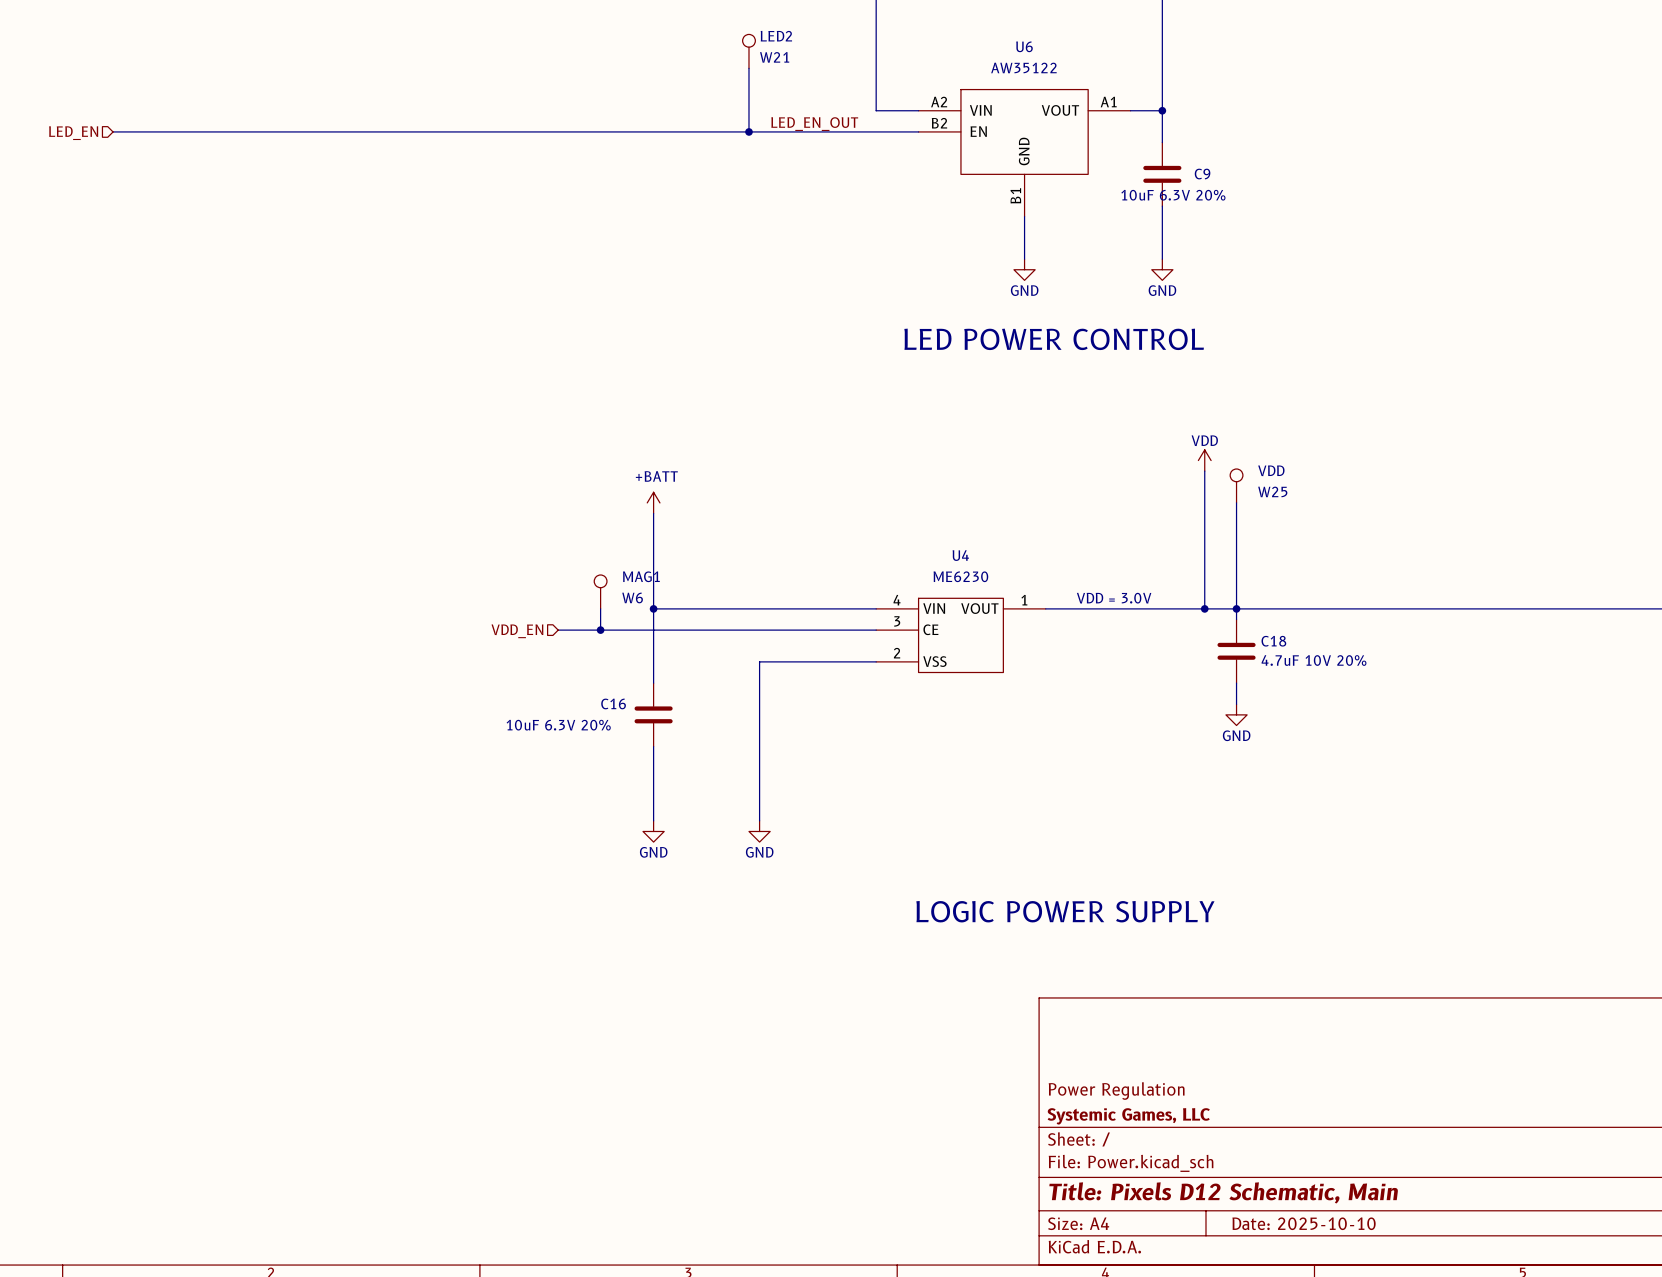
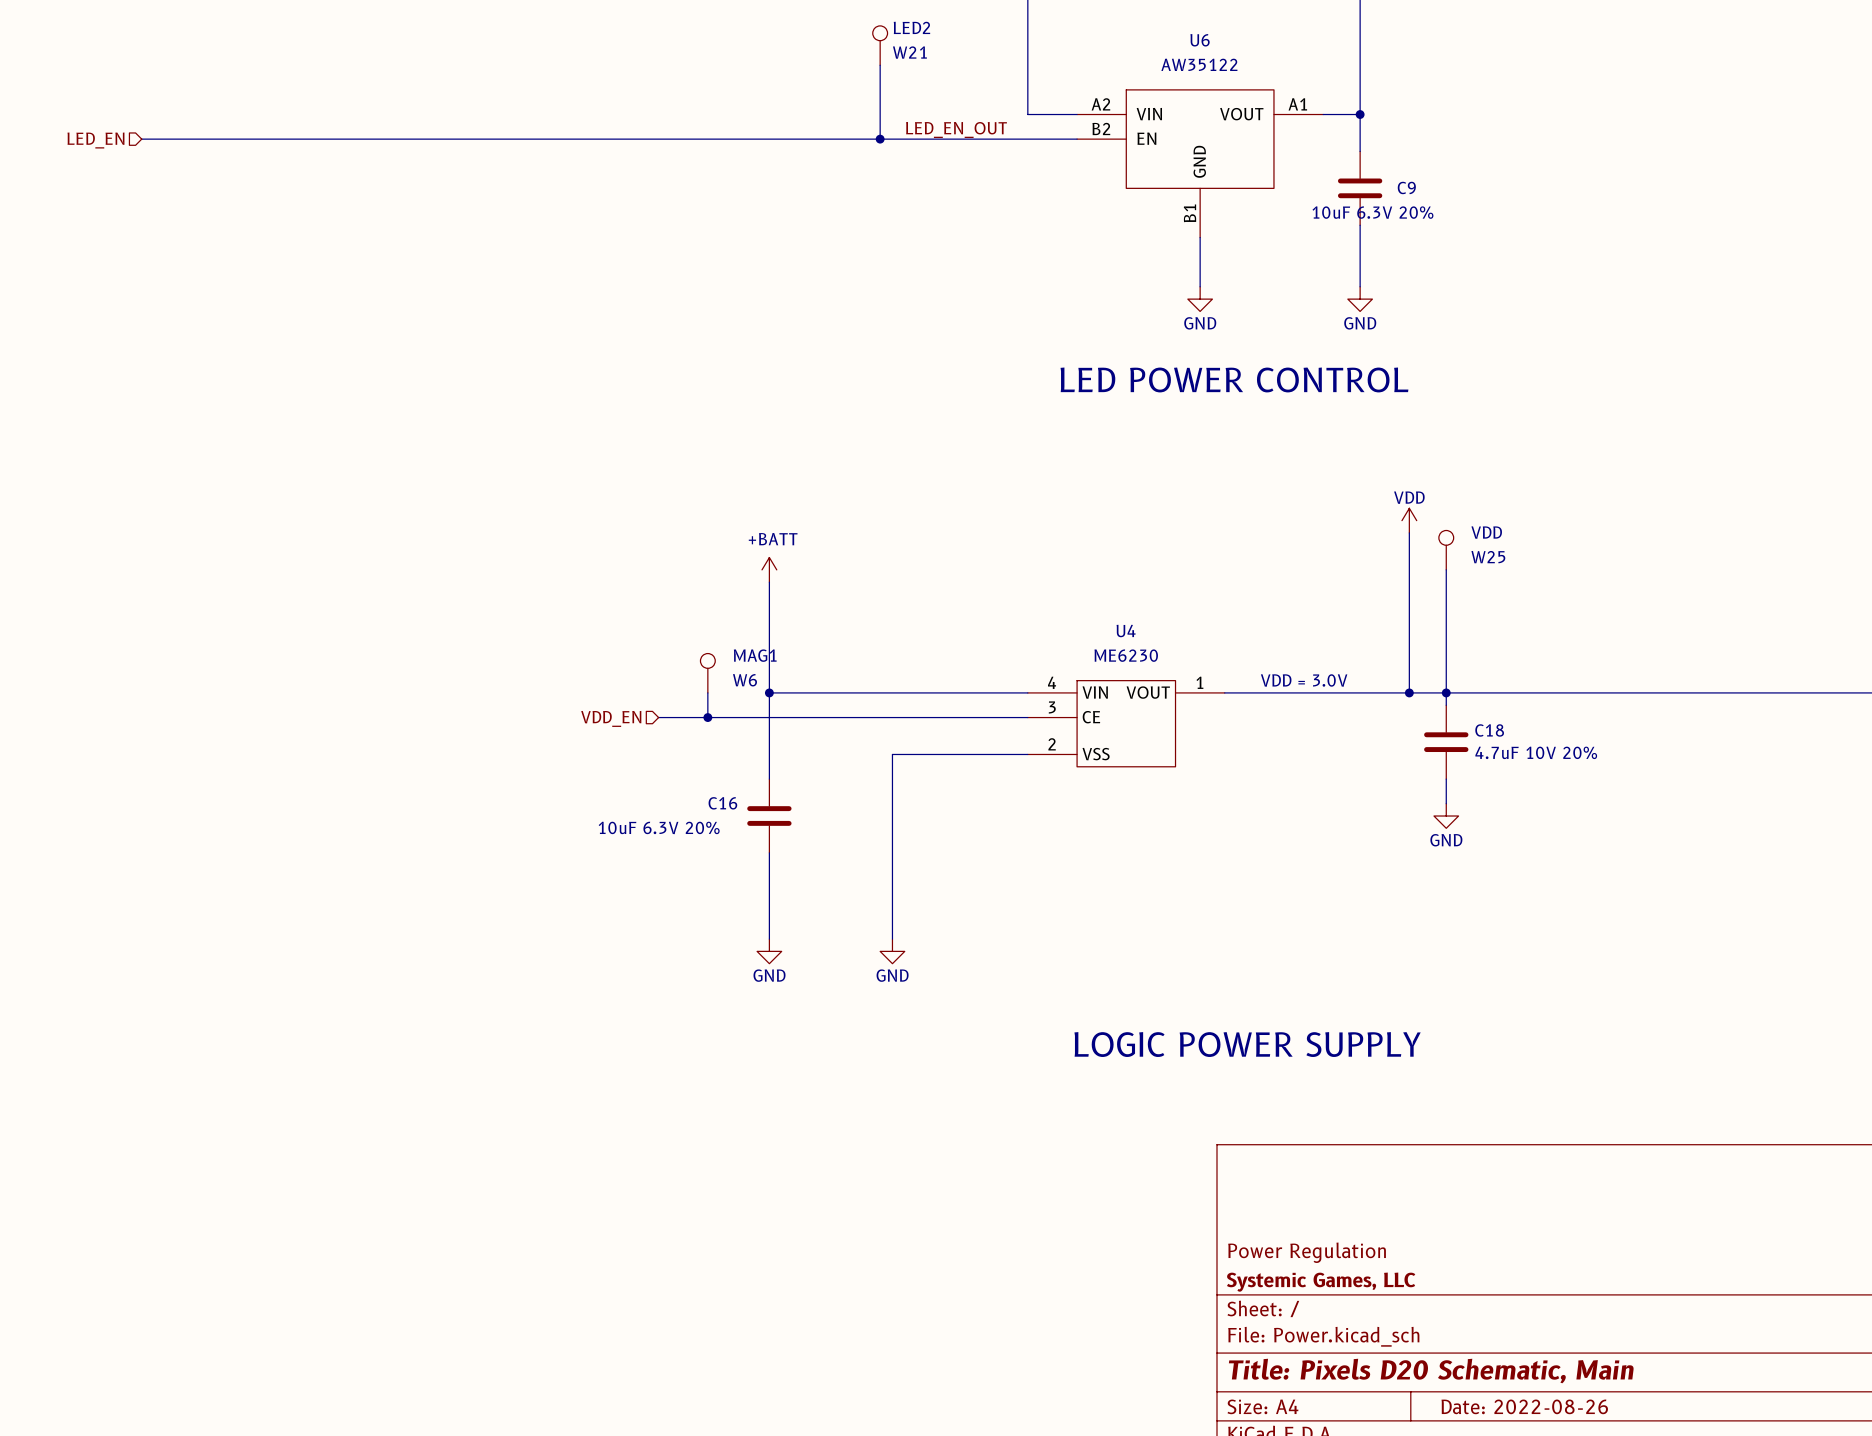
title block: Title: Pixels D12 Schematic, Main (1223, 1192) -> Title: Pixels D20 Schematic, Main (1431, 1371)
title block: Date: 2025-10-10 (1304, 1223) -> Date: 2022-08-26 (1524, 1406)

